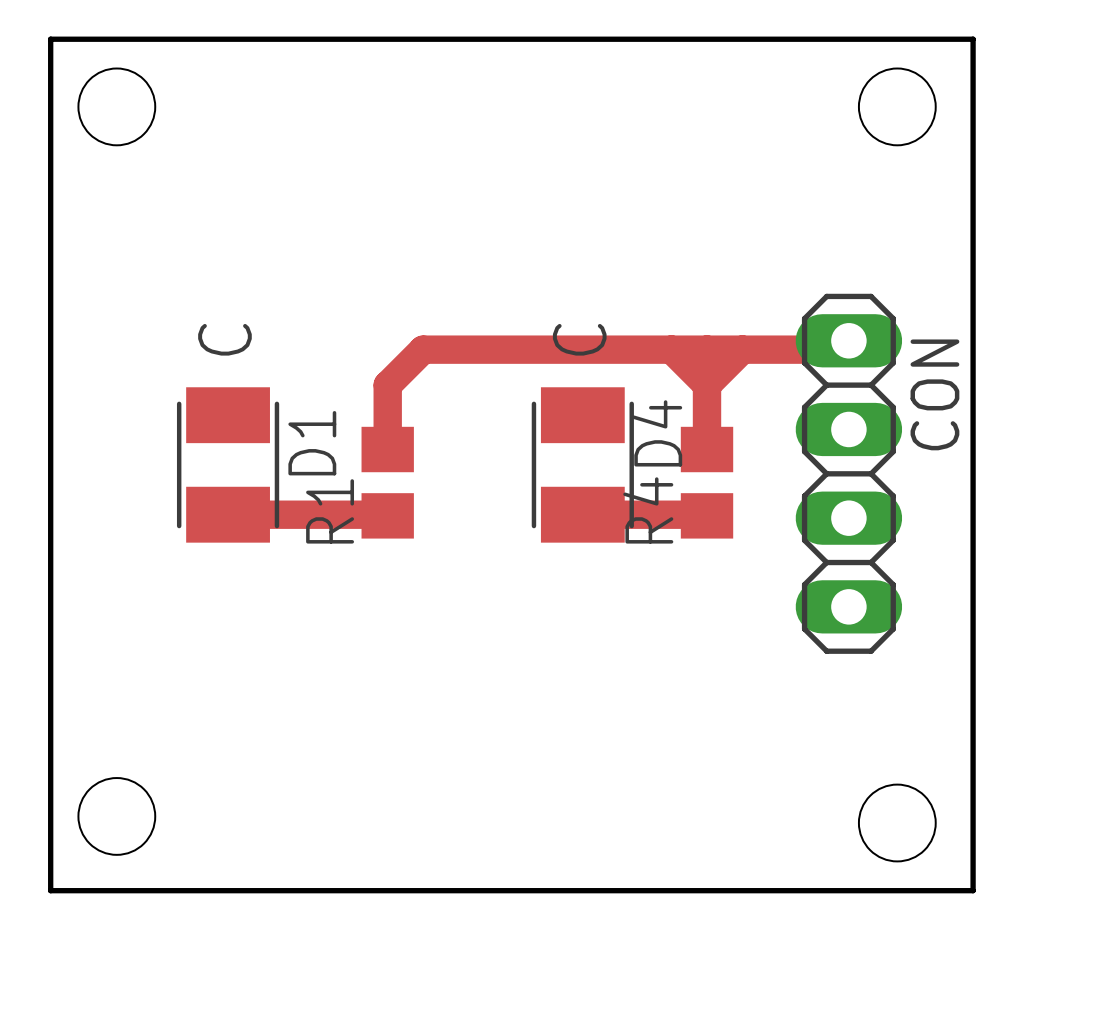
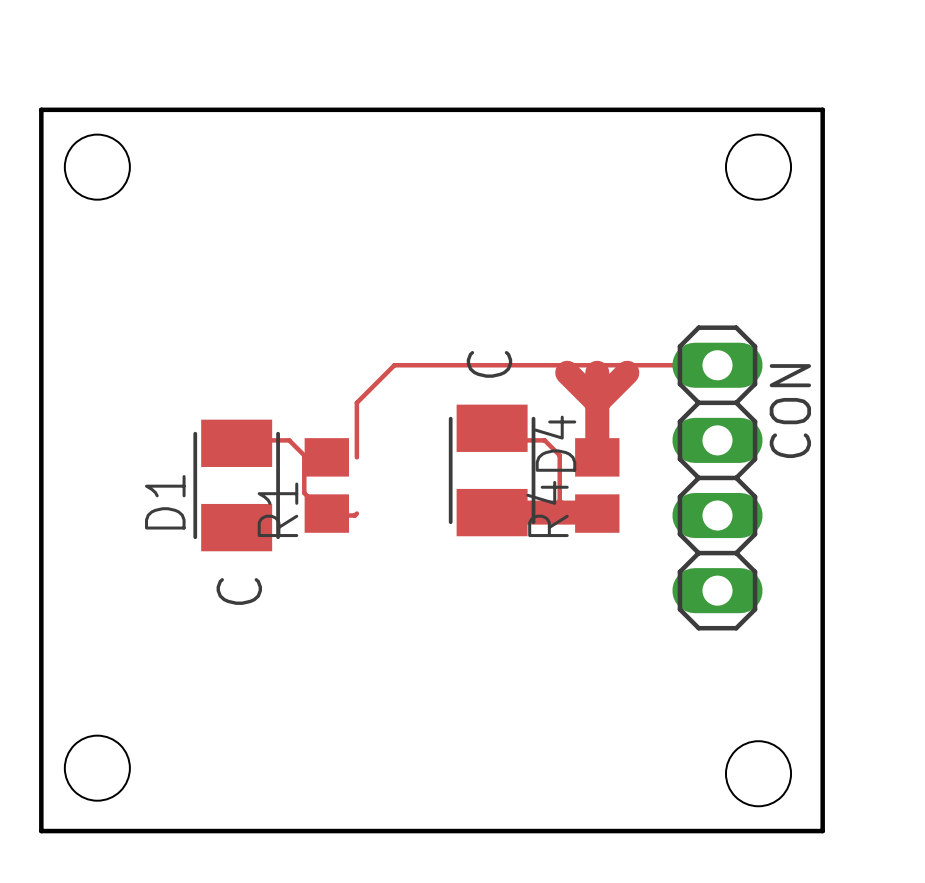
D1 text position: C (224, 339) -> C (239, 591)
top track: (848, 340) (840, 349) (423, 349) (387, 385) (387, 449) -> (717, 365) (394, 365) (356, 402) (356, 457)
top track: none -> (236, 443) (239, 440) (289, 440) (304, 455) (304, 492) (326, 515) (354, 515) (356, 513)
top track: none -> (492, 443) (495, 440) (544, 440) (559, 455) (559, 500) (574, 515) (610, 515) (612, 513)
D1 name position: D1 (312, 443) -> D1 (165, 502)
D1 position: (228, 464) -> (236, 485)
top track: (228, 514) (386, 514) (385, 518) -> none

